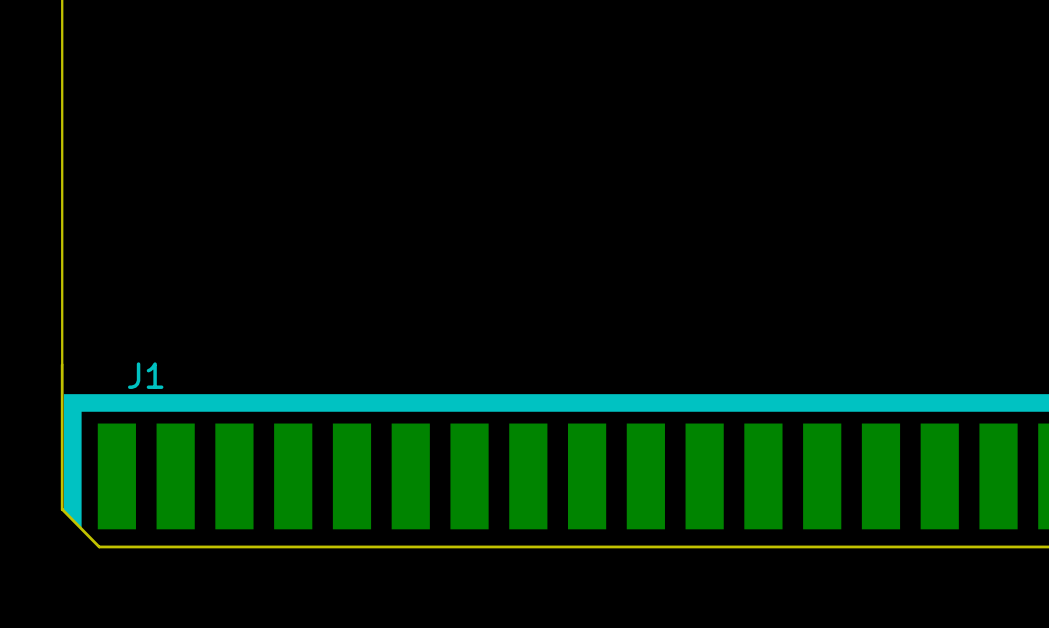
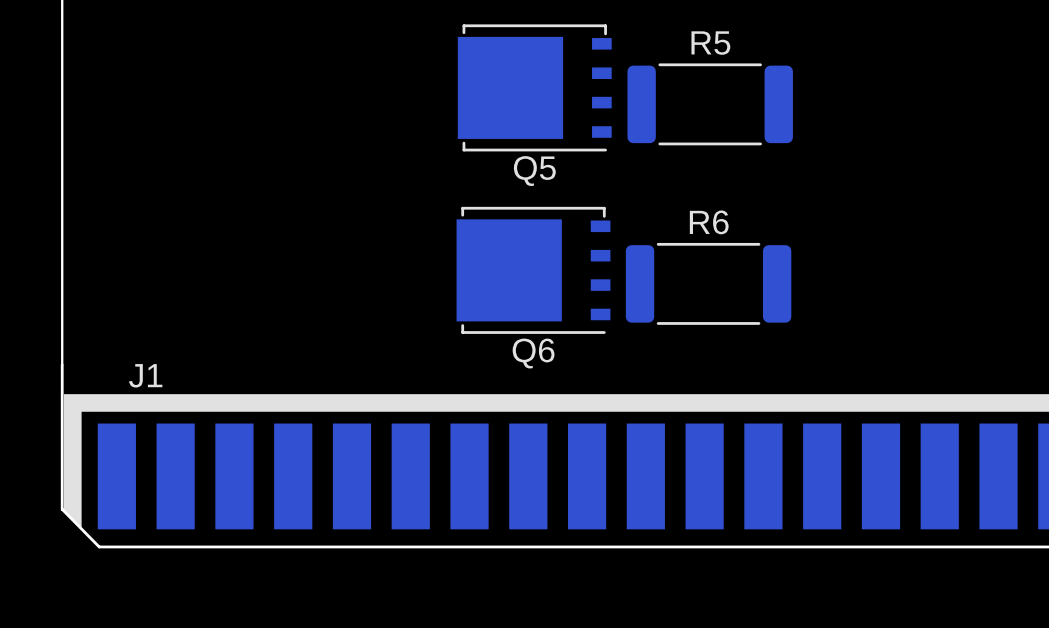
Q5: none -> (534, 87)
R5: none -> (710, 104)
Q6: none -> (533, 270)
R6: none -> (708, 283)

